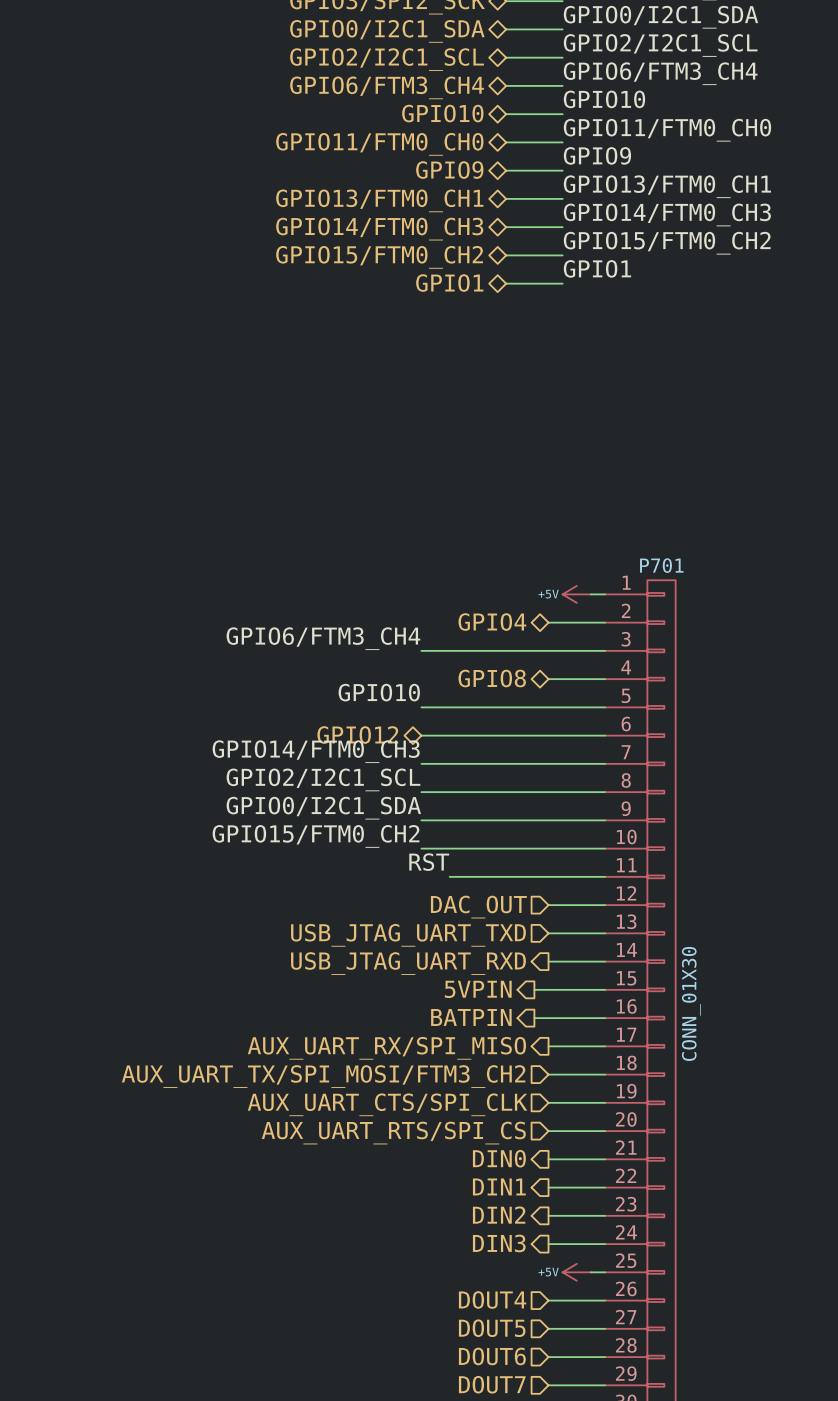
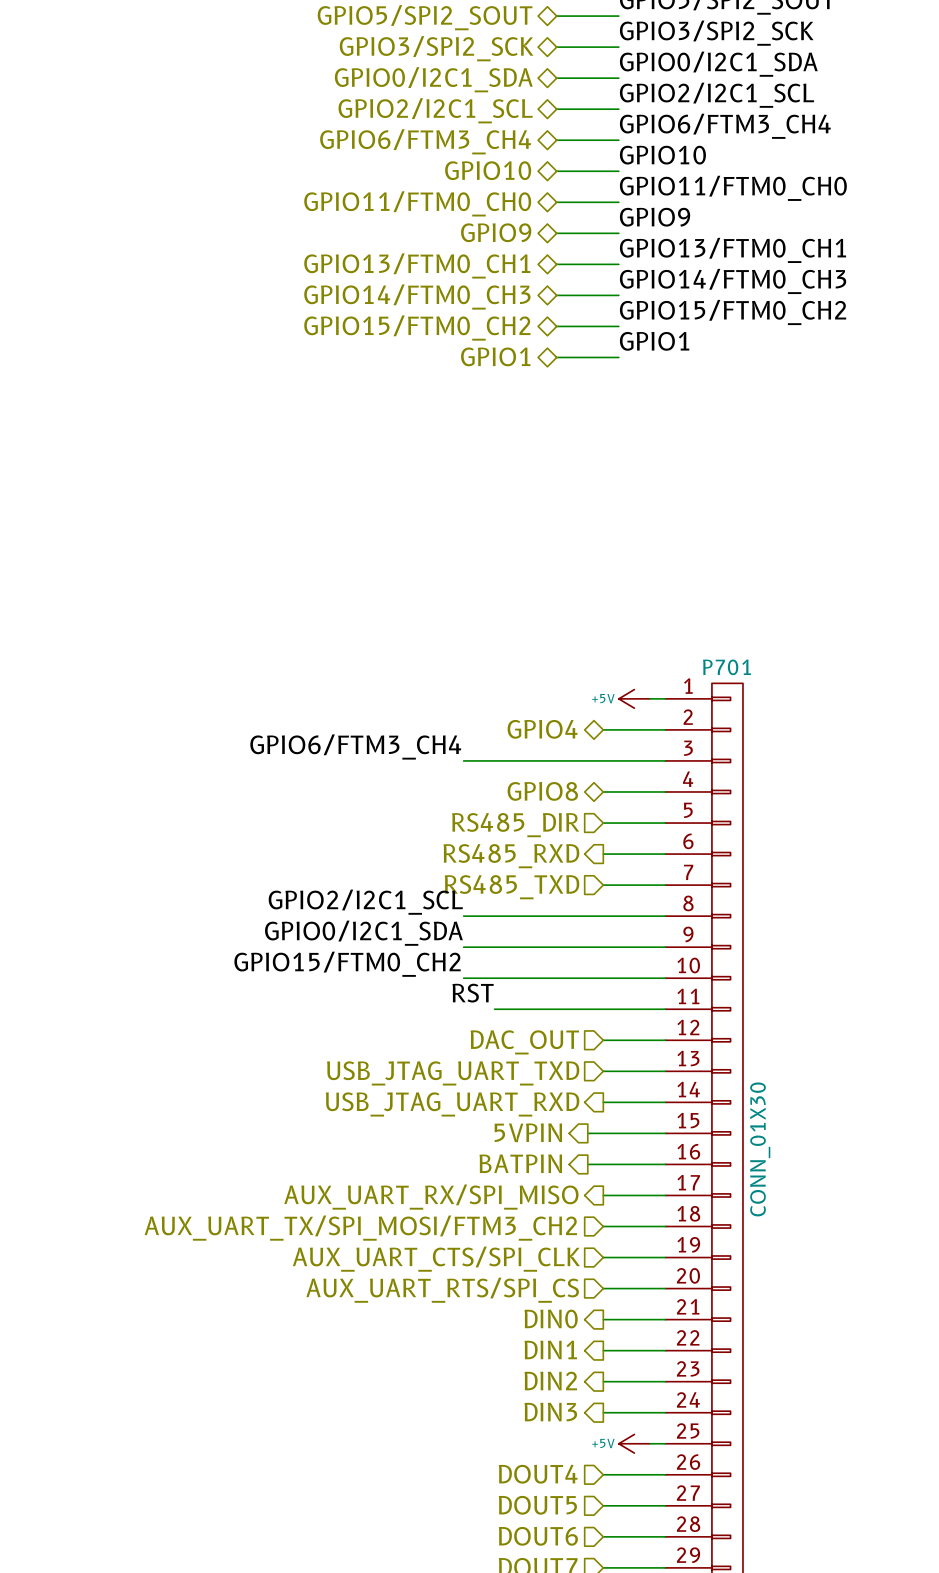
label: GPIO10 (379, 692) -> none
wire: (421, 707) (548, 707) -> none
hierarchical label: none -> RS485_DIR (515, 825)
hierarchical label: GPIO12 (357, 735) -> none
wire: (421, 735) (548, 735) -> none
hierarchical label: none -> RS485_RXD (511, 856)
label: GPIO14/FTM0_CH3 (316, 751) -> none
wire: (421, 763) (548, 763) -> none
hierarchical label: none -> RS485_TXD (512, 887)

